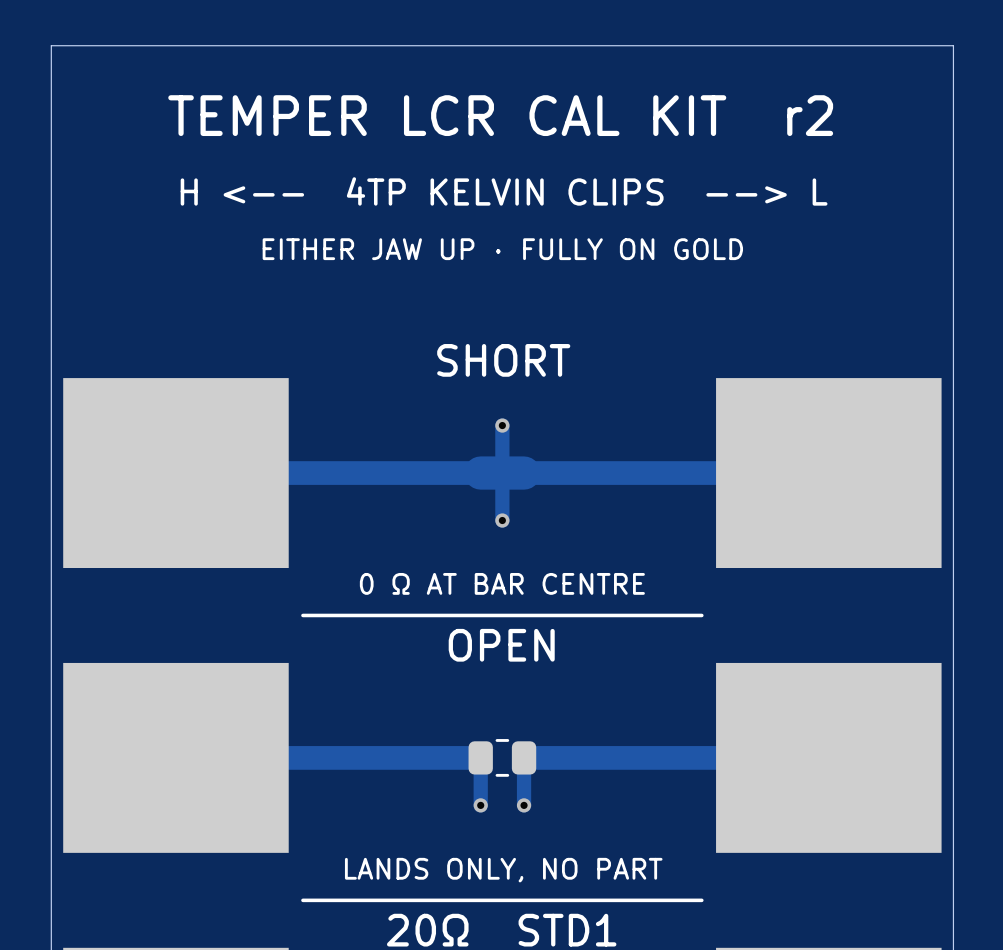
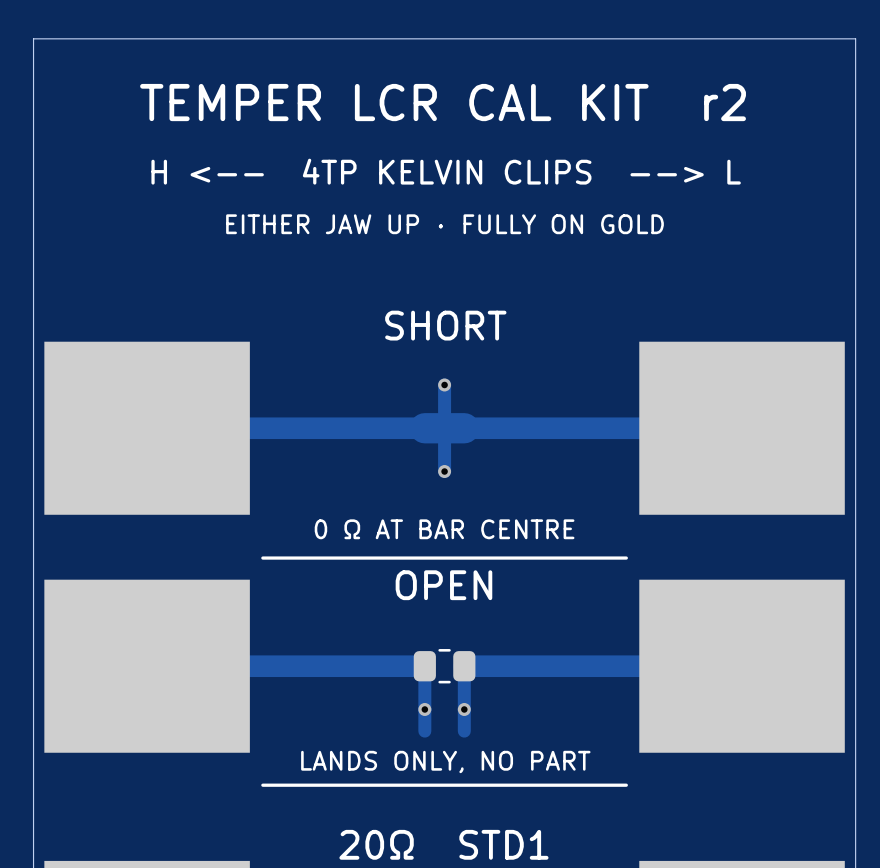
part position: (175, 757) -> (147, 666)
track: (241, 757) (480, 757) -> (206, 666) (424, 666) (424, 687)
part position: (502, 757) -> (444, 666)
track: (524, 757) (763, 757) -> (464, 687) (464, 666) (682, 666)
part position: (828, 757) -> (742, 666)
via position: (480, 805) -> (424, 709)
via position: (524, 805) -> (464, 709)
text position: LANDS ONLY, NO PART (503, 870) -> LANDS ONLY, NO PART (445, 762)
line: (302, 900) (701, 900) -> (262, 785) (626, 785)

